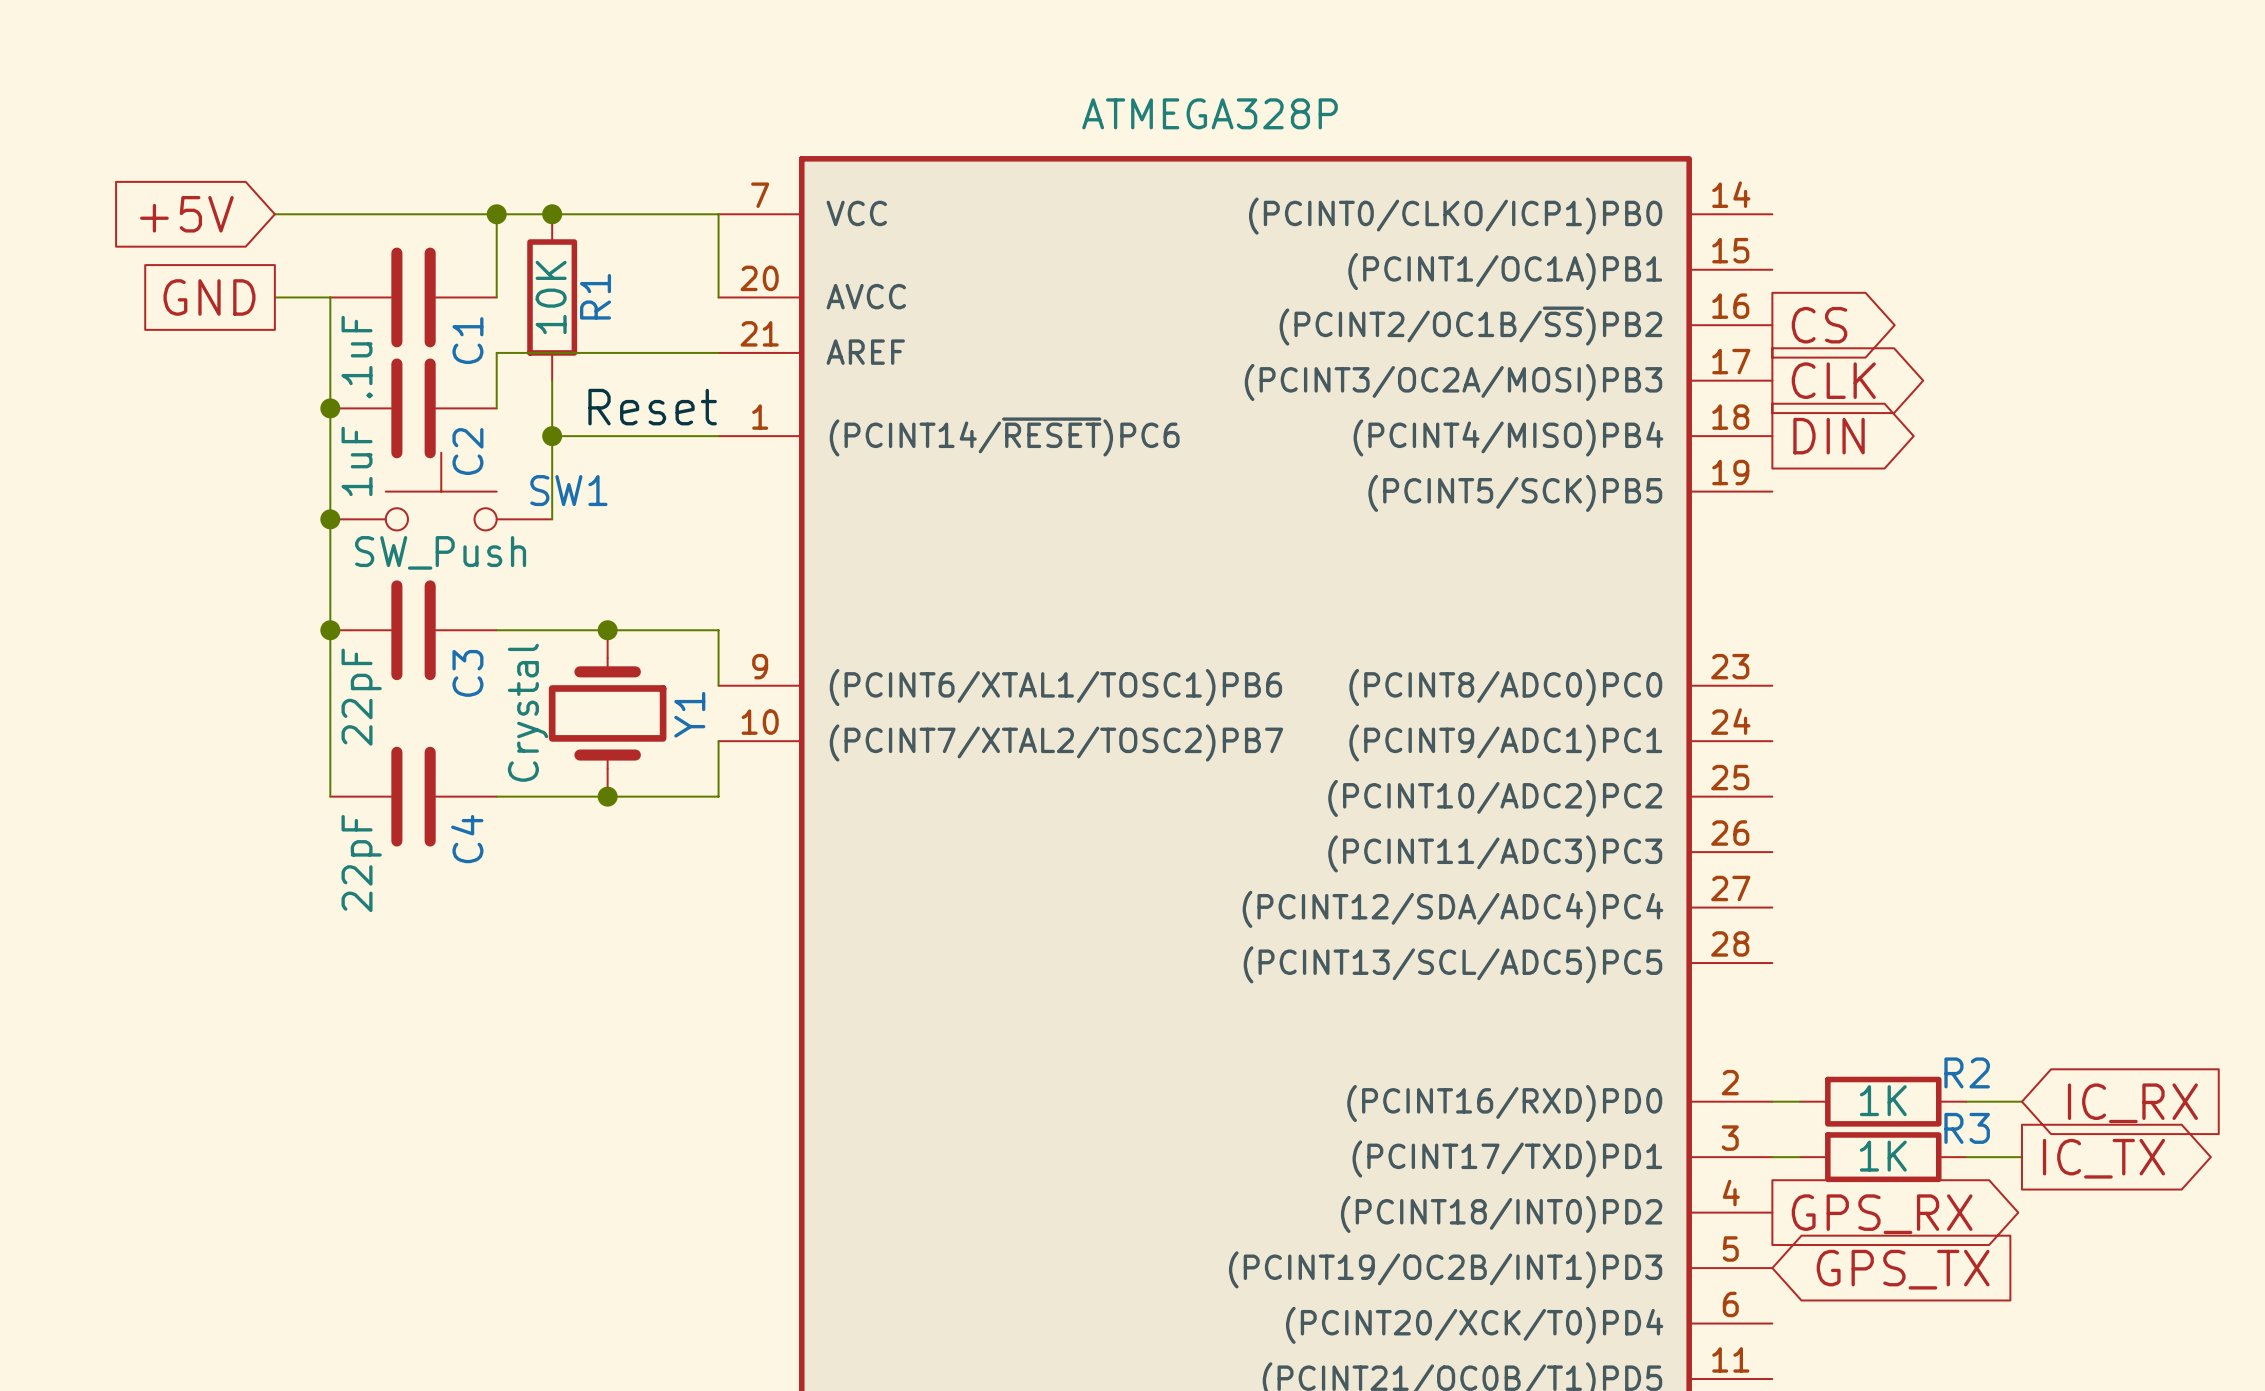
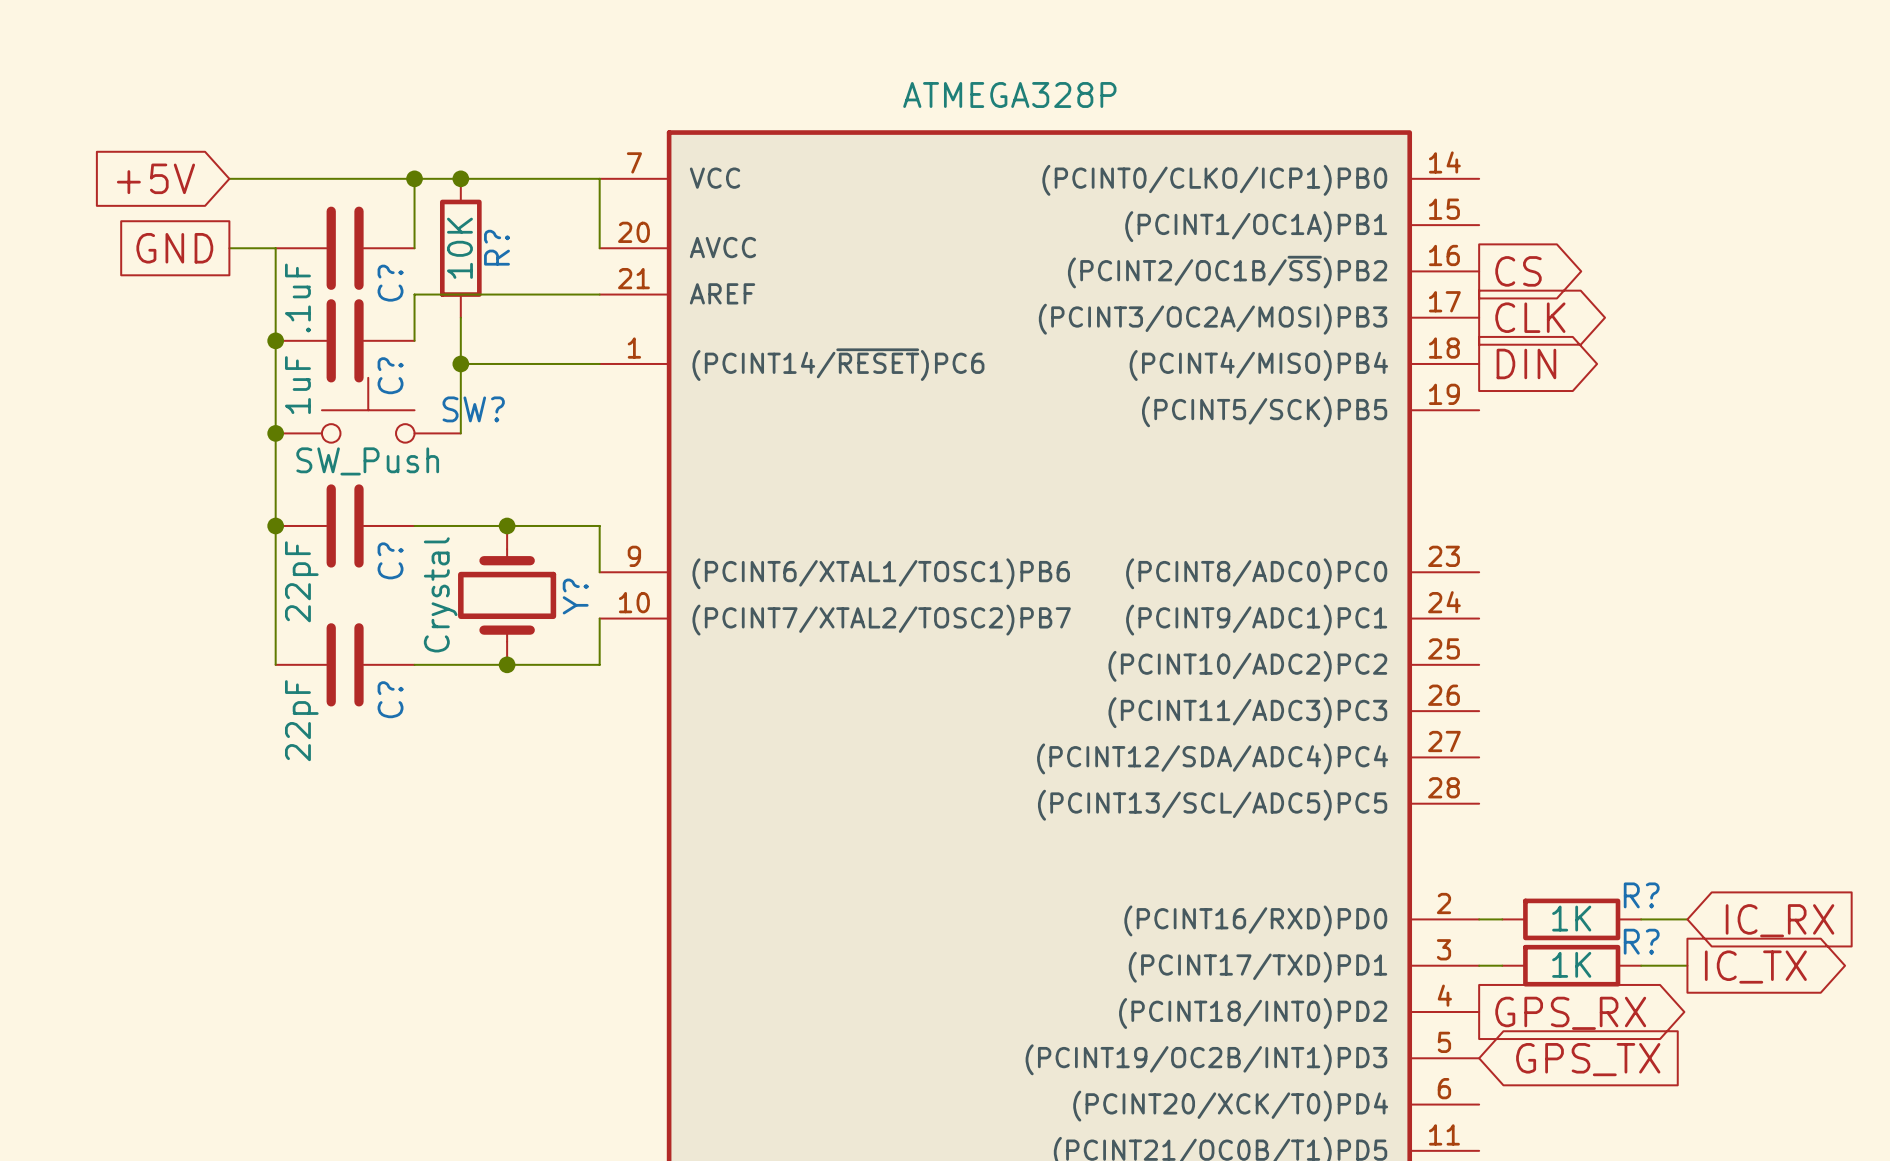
R1 name: R1 (595, 296) -> R? (496, 247)
C1 name: C1 (467, 340) -> C? (390, 283)
label: Reset (652, 407) -> none
C2 name: C2 (467, 451) -> C? (390, 375)
SW1 name: SW1 (568, 490) -> SW? (473, 409)
C3 name: C3 (467, 673) -> C? (390, 560)
Y1 name: Y1 (689, 714) -> Y? (575, 596)
C4 name: C4 (467, 839) -> C? (390, 699)
R2 name: R2 (1967, 1072) -> R? (1641, 895)
R3 name: R3 (1967, 1128) -> R? (1641, 941)

